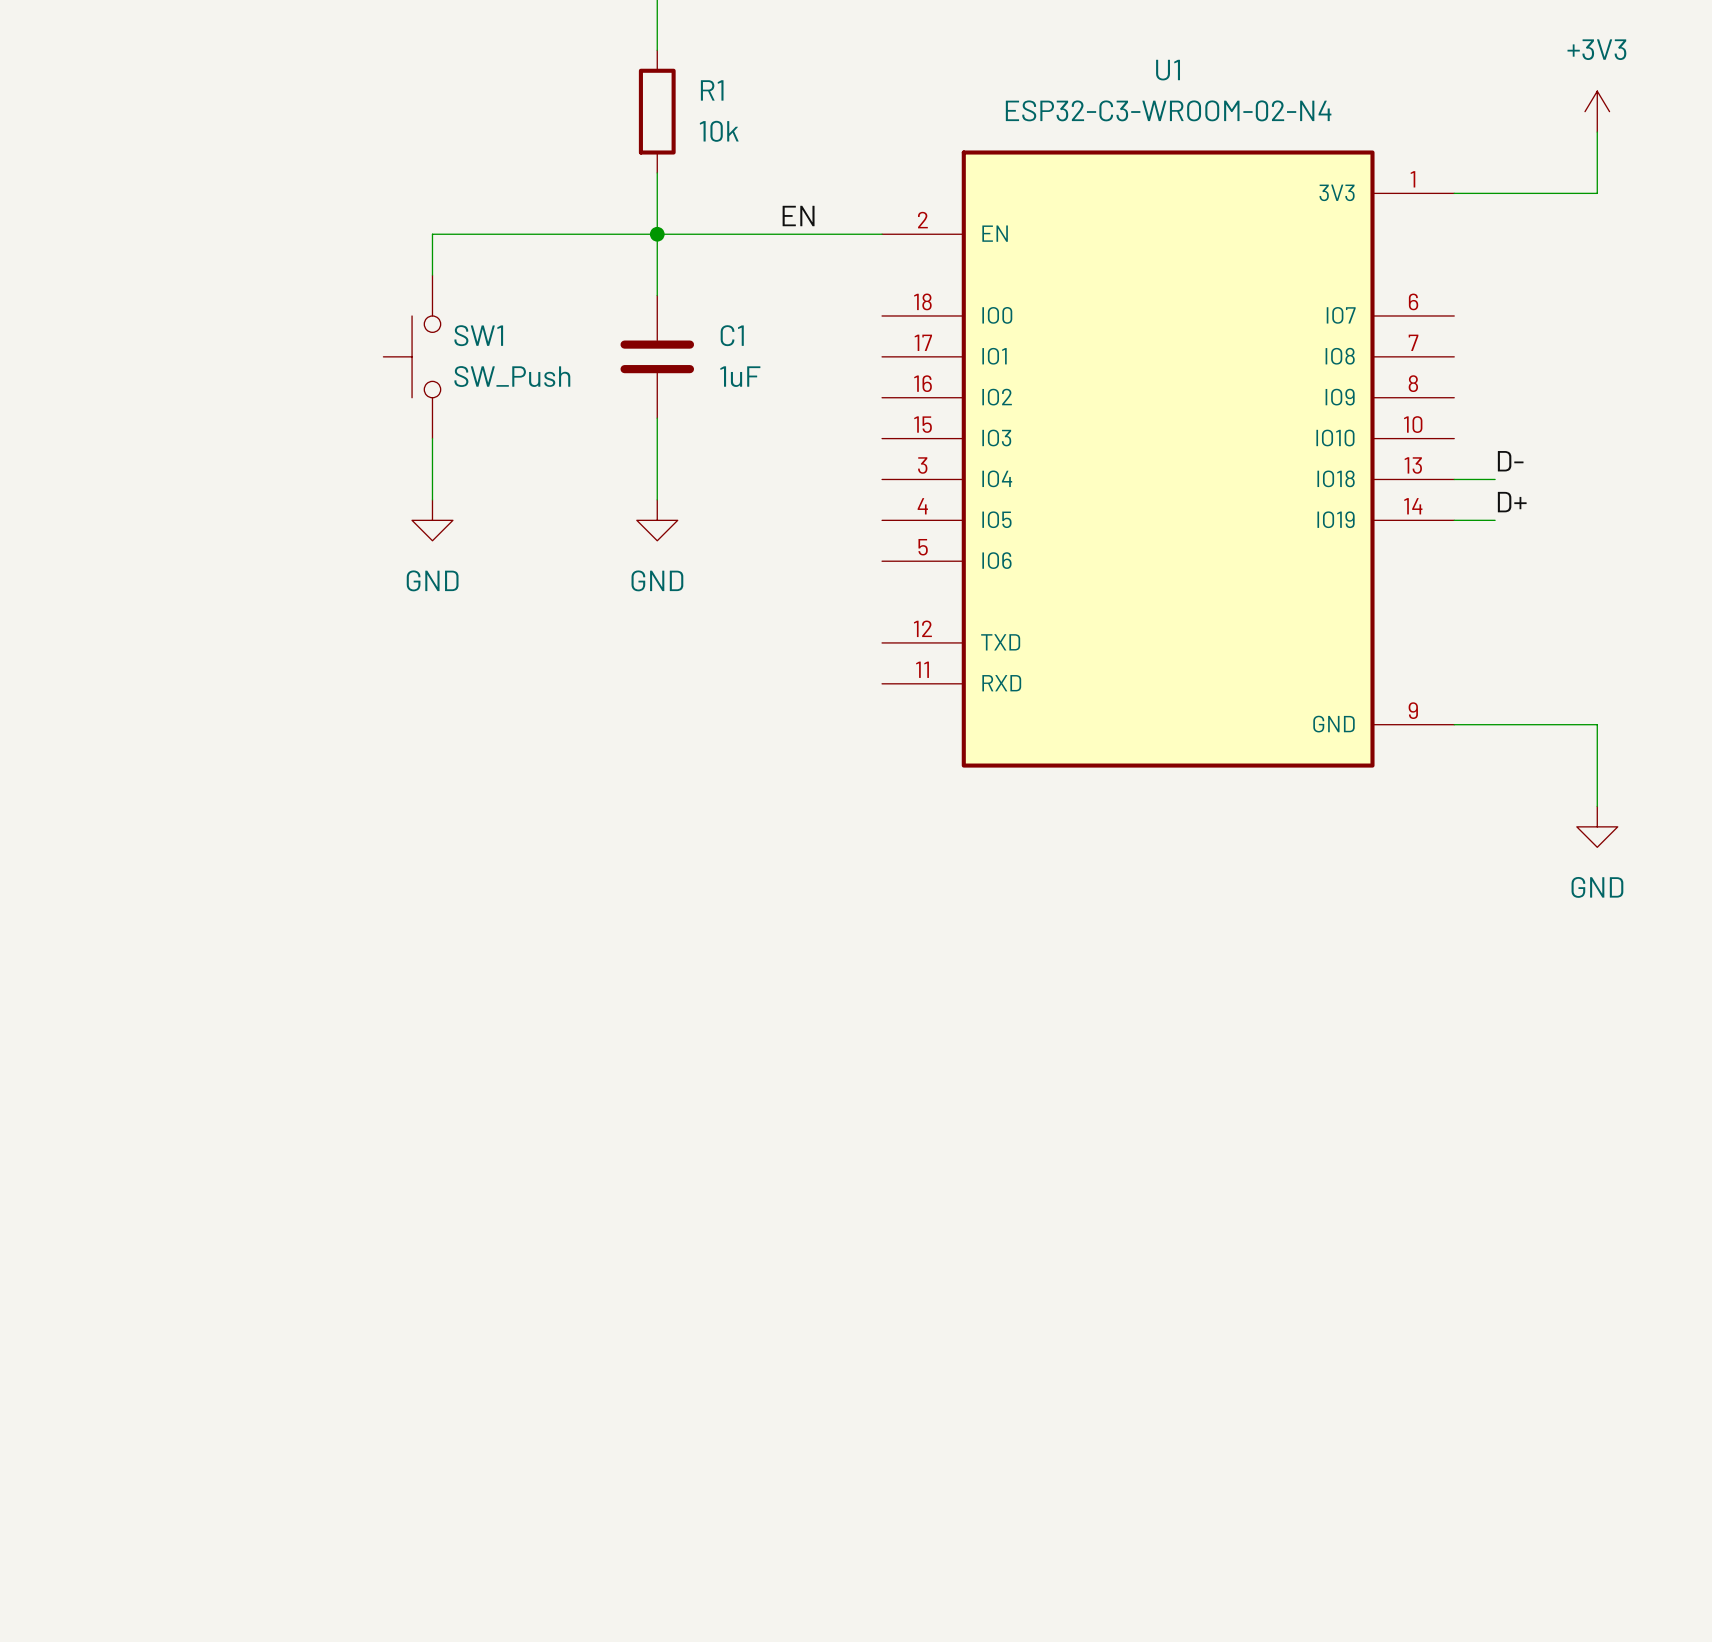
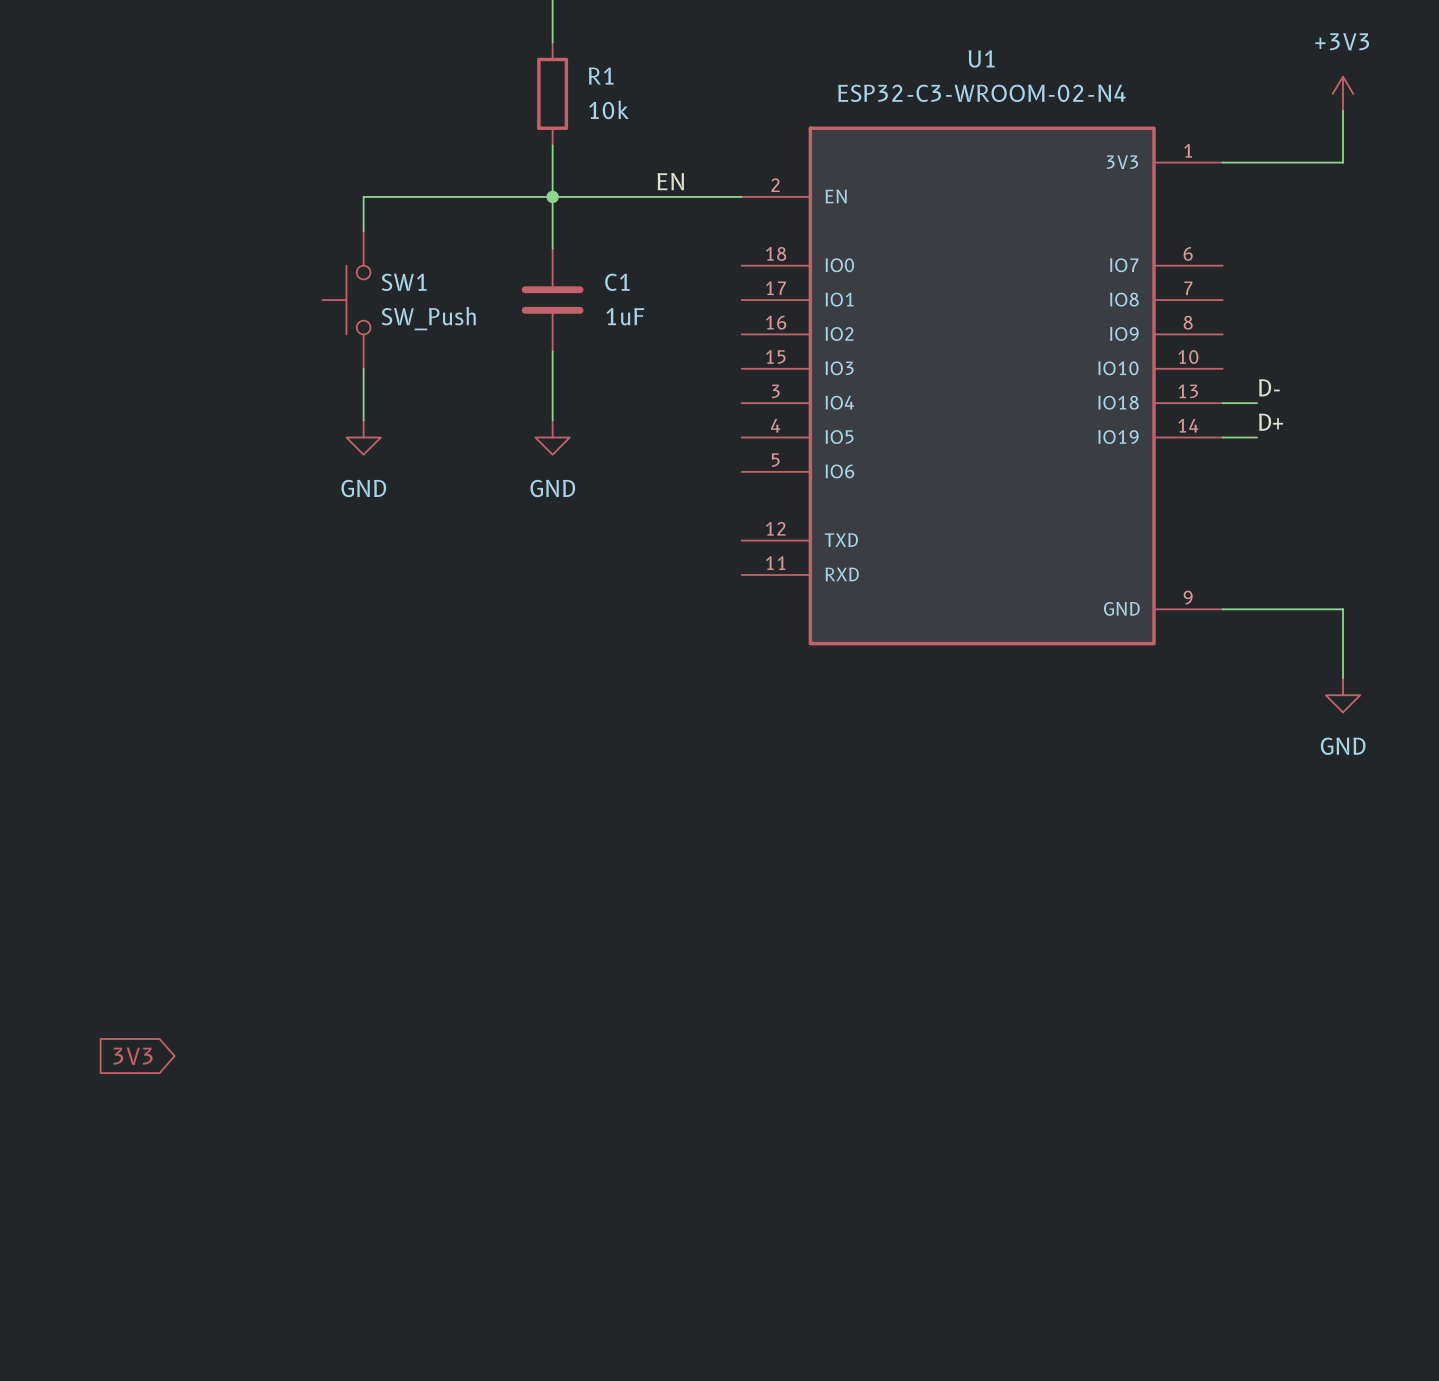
global label: none -> 3V3 (133, 1056)

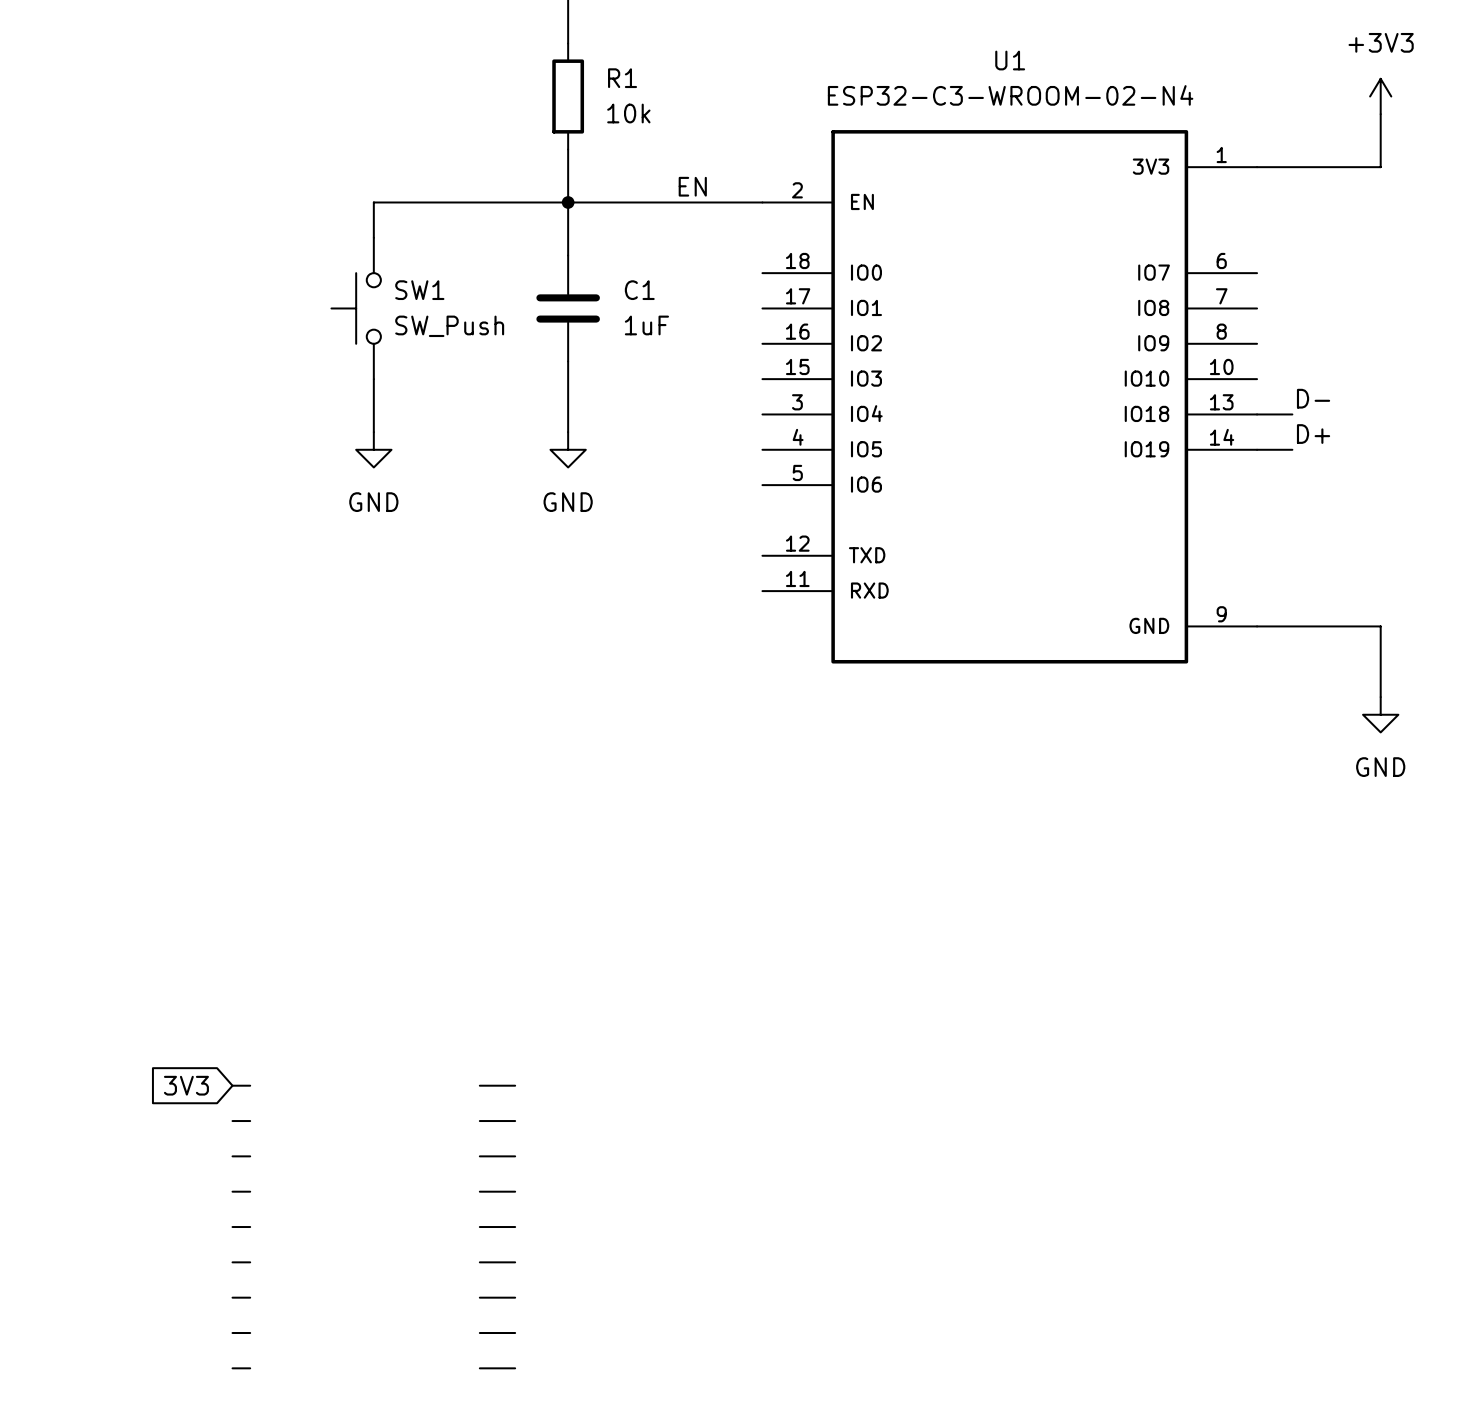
global label position: 3V3 (133, 1056) -> 3V3 (186, 1085)
wire: none -> (232, 1085) (250, 1085)
wire: none -> (479, 1085) (515, 1085)
wire: none -> (232, 1121) (250, 1121)
wire: none -> (479, 1121) (515, 1121)
wire: none -> (232, 1156) (250, 1156)
wire: none -> (479, 1156) (515, 1156)
wire: none -> (232, 1191) (250, 1191)
wire: none -> (479, 1191) (515, 1191)
wire: none -> (232, 1227) (250, 1227)
wire: none -> (479, 1227) (515, 1227)
wire: none -> (232, 1262) (250, 1262)
wire: none -> (479, 1262) (515, 1262)
wire: none -> (232, 1297) (250, 1297)
wire: none -> (479, 1297) (515, 1297)
wire: none -> (232, 1333) (250, 1333)
wire: none -> (479, 1333) (515, 1333)
wire: none -> (232, 1368) (250, 1368)
wire: none -> (479, 1368) (515, 1368)

